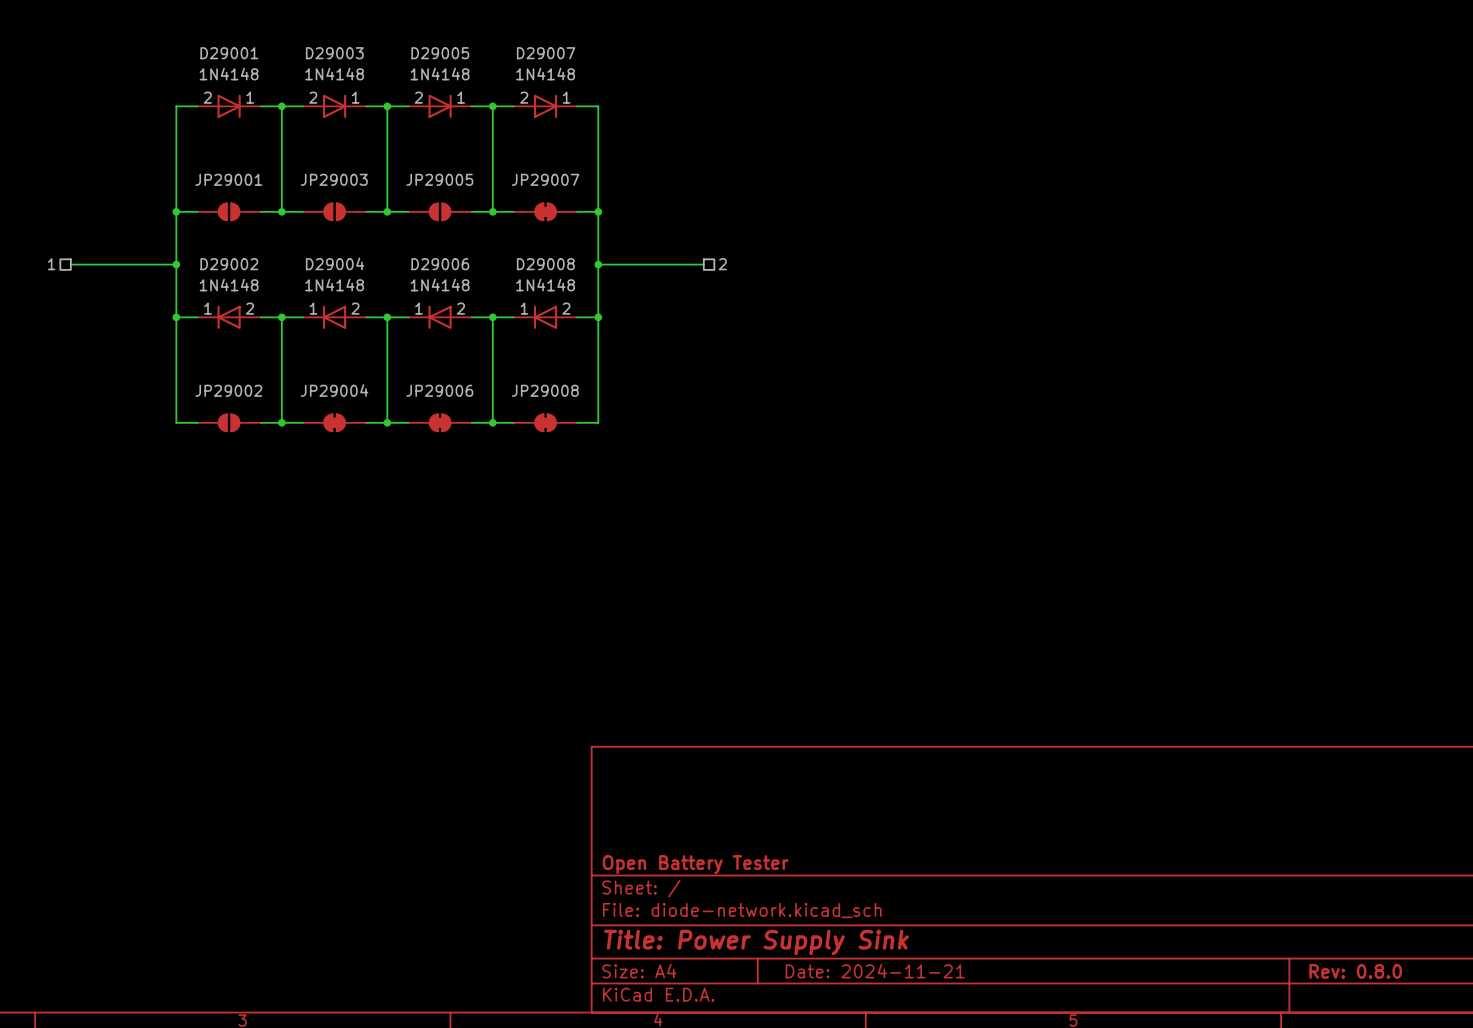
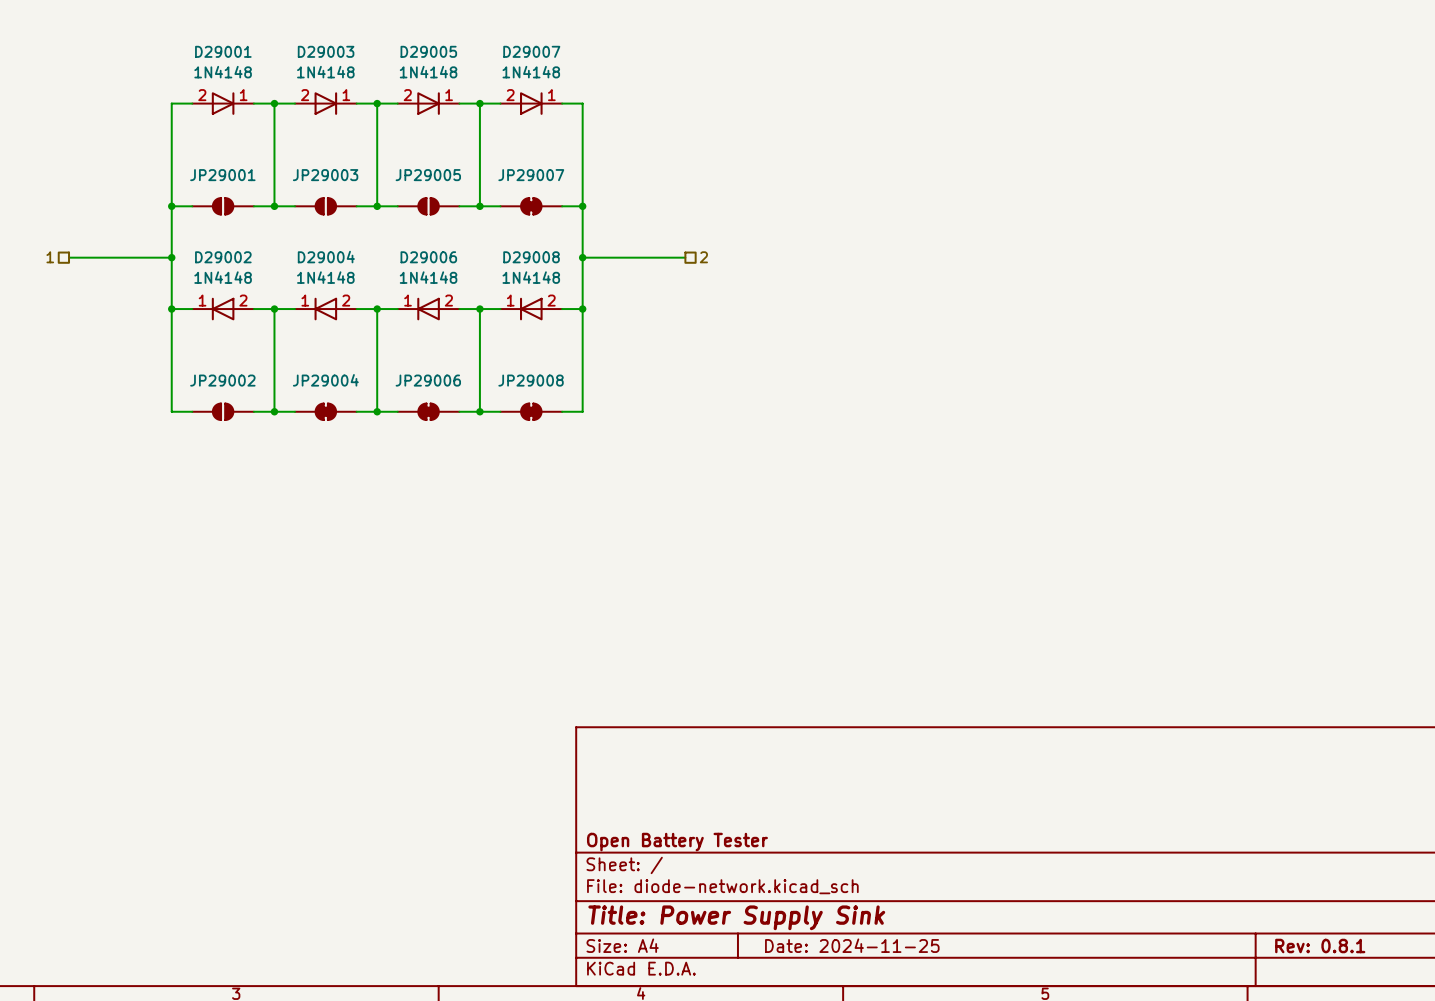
title block: Date: 2024-11-21 (875, 971) -> Date: 2024-11-25 (852, 945)
title block: Rev: 0.8.0 (1355, 971) -> Rev: 0.8.1 (1320, 945)

